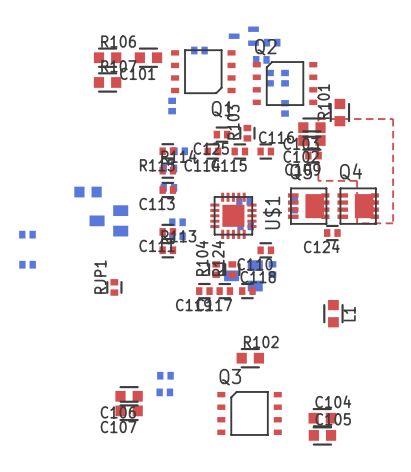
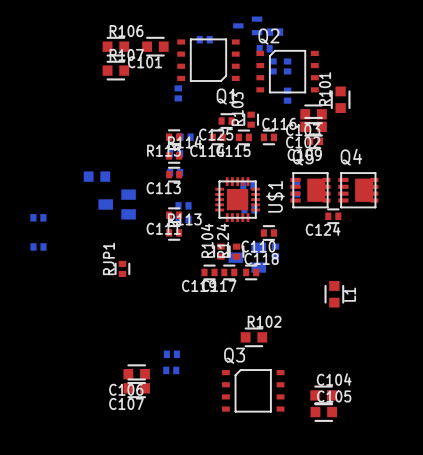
top zone outline: (318, 119) (318, 180) (357, 180) (357, 223) (393, 223) (393, 119) (318, 119) -> none

